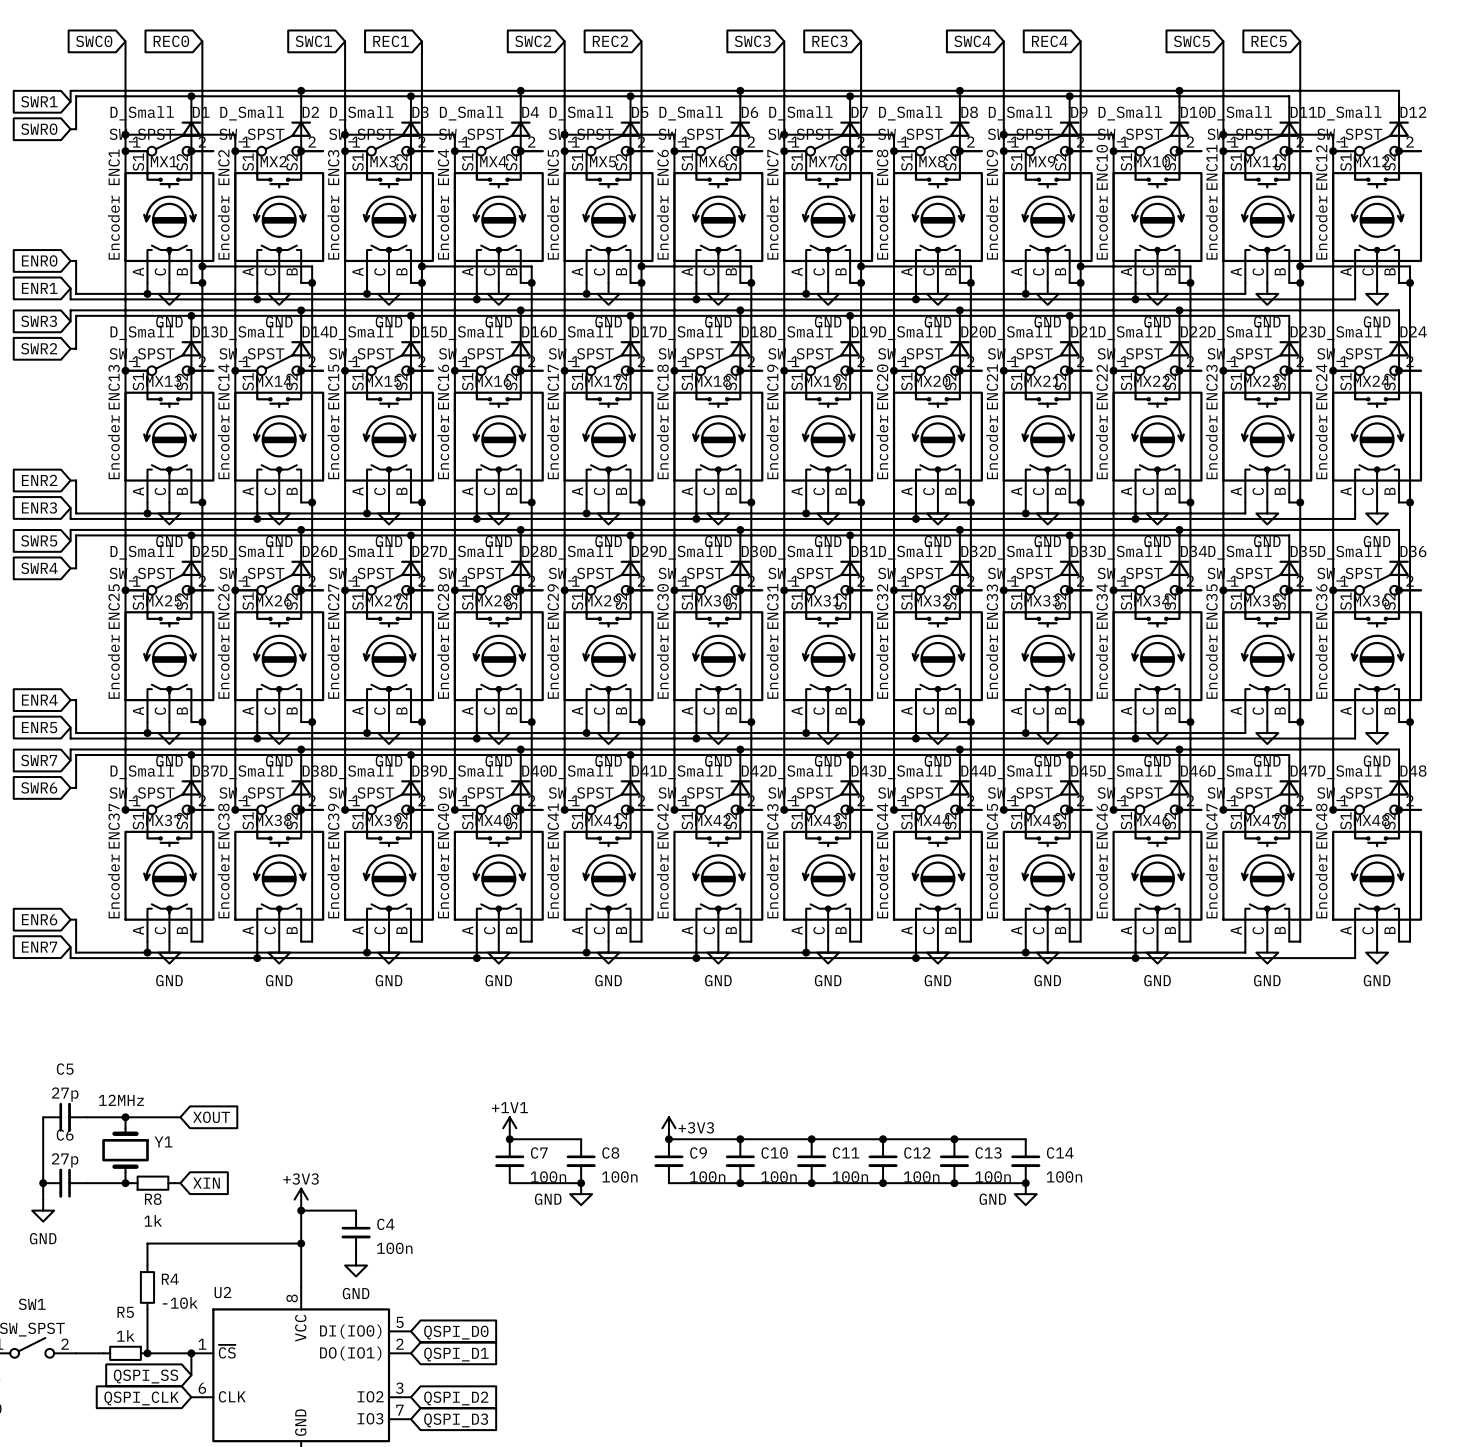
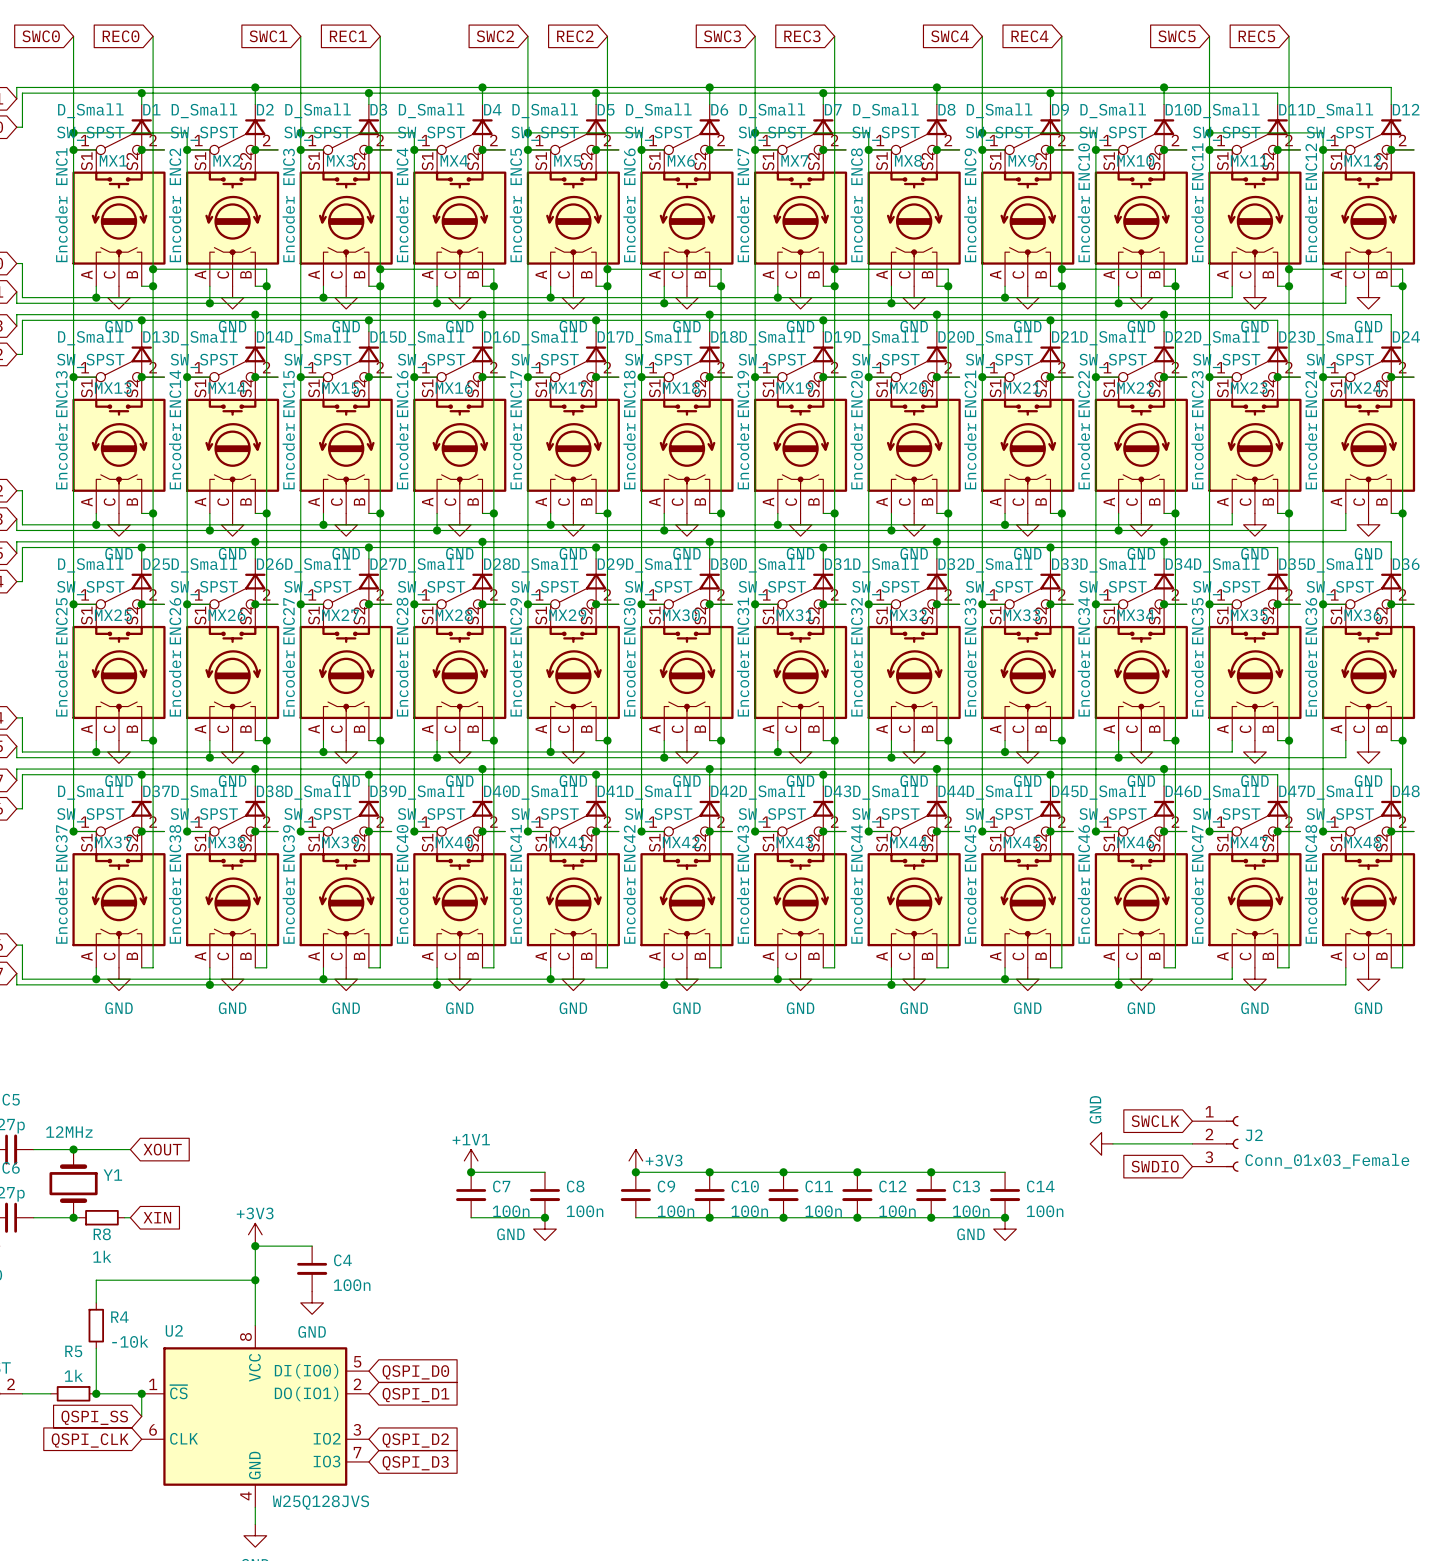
global label: none -> SWCLK (1155, 1121)
power symbol: none -> GND (1101, 1143)
wire: none -> (1112, 1143) (1192, 1143)
J2: none -> Conn_01x03_Female (1215, 1143)
global label: none -> SWDIO (1155, 1166)

